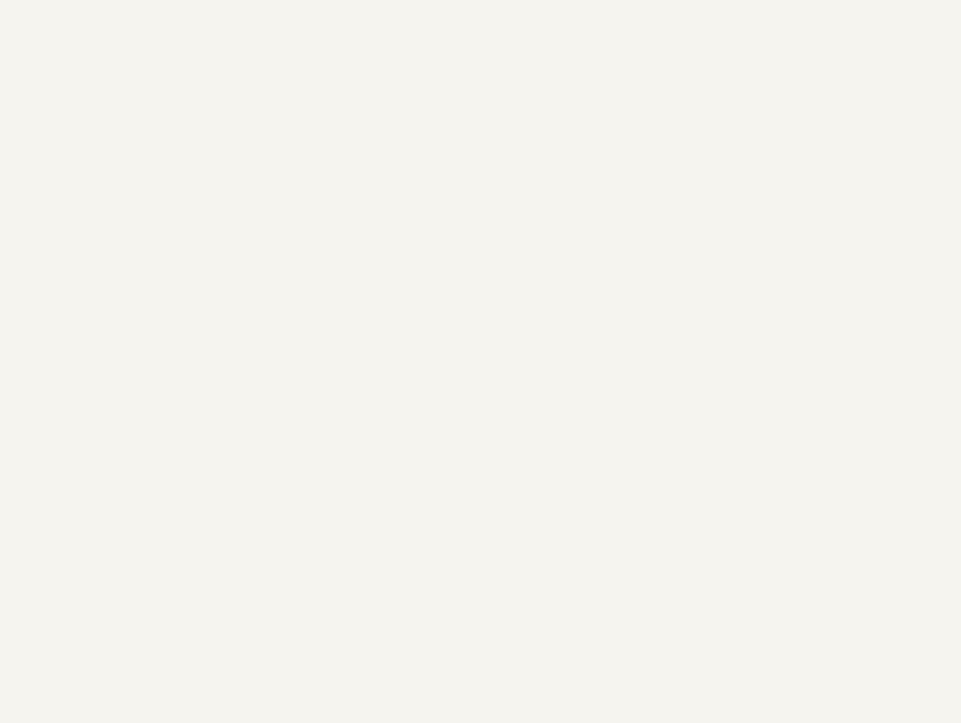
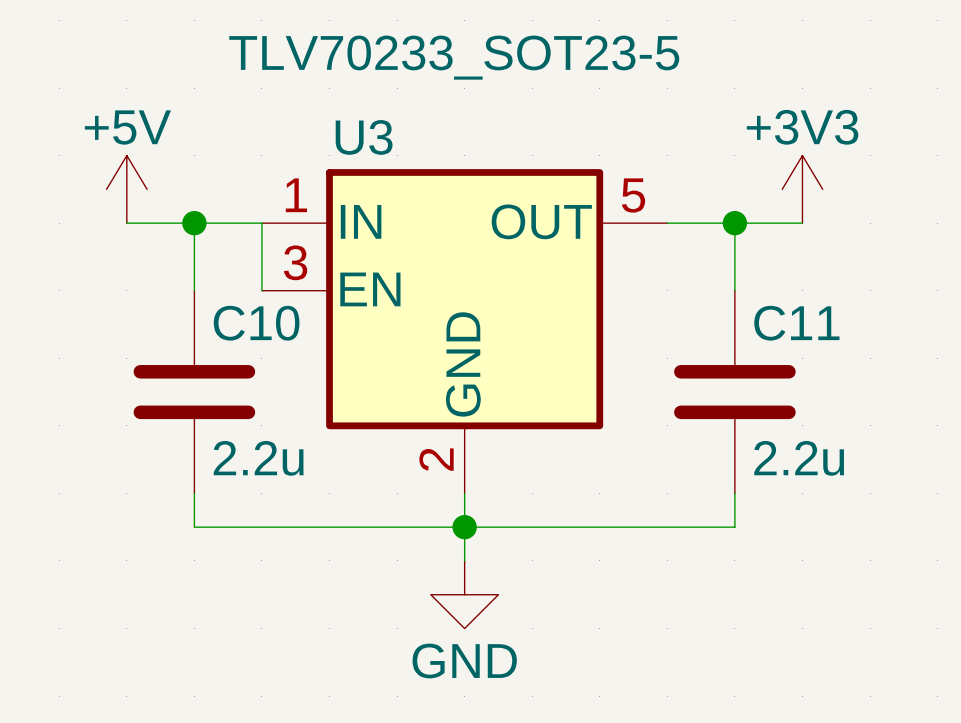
power symbol: none -> +5V (126, 189)
power symbol: none -> +3V3 (802, 189)
wire: none -> (126, 223) (261, 223) (261, 290)
wire: none -> (194, 223) (194, 290)
junction: none -> (194, 223)
wire: none -> (667, 223) (802, 223)
wire: none -> (734, 223) (734, 290)
junction: none -> (734, 223)
U3: none -> TLV70233_SOT23-5 (464, 331)
C10: none -> 2.2u (194, 392)
C11: none -> 2.2u (734, 392)
wire: none -> (194, 493) (194, 527) (734, 527) (734, 493)
wire: none -> (464, 493) (464, 560)
junction: none -> (464, 527)
power symbol: none -> GND (464, 594)

